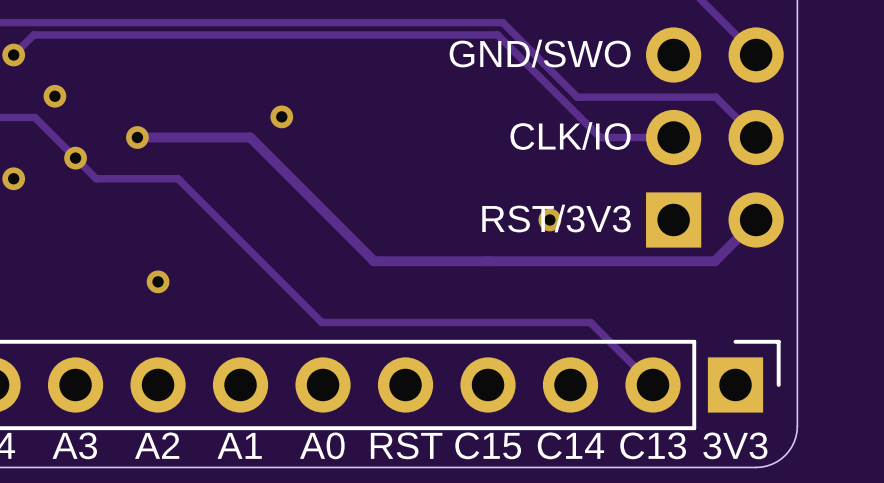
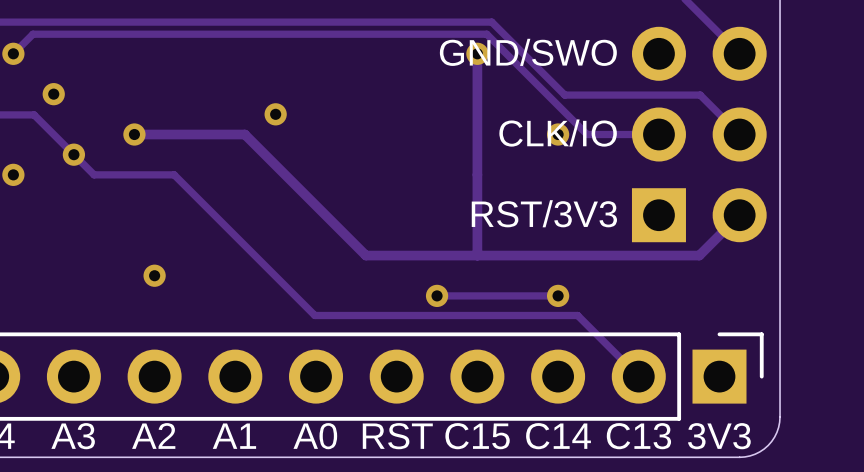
track: none -> (477, 53) (477, 255)
via: none -> (477, 53)
via: none -> (558, 134)
via: (549, 219) -> none
via: none -> (437, 295)
track: none -> (558, 295) (437, 295)
via: none -> (558, 295)

